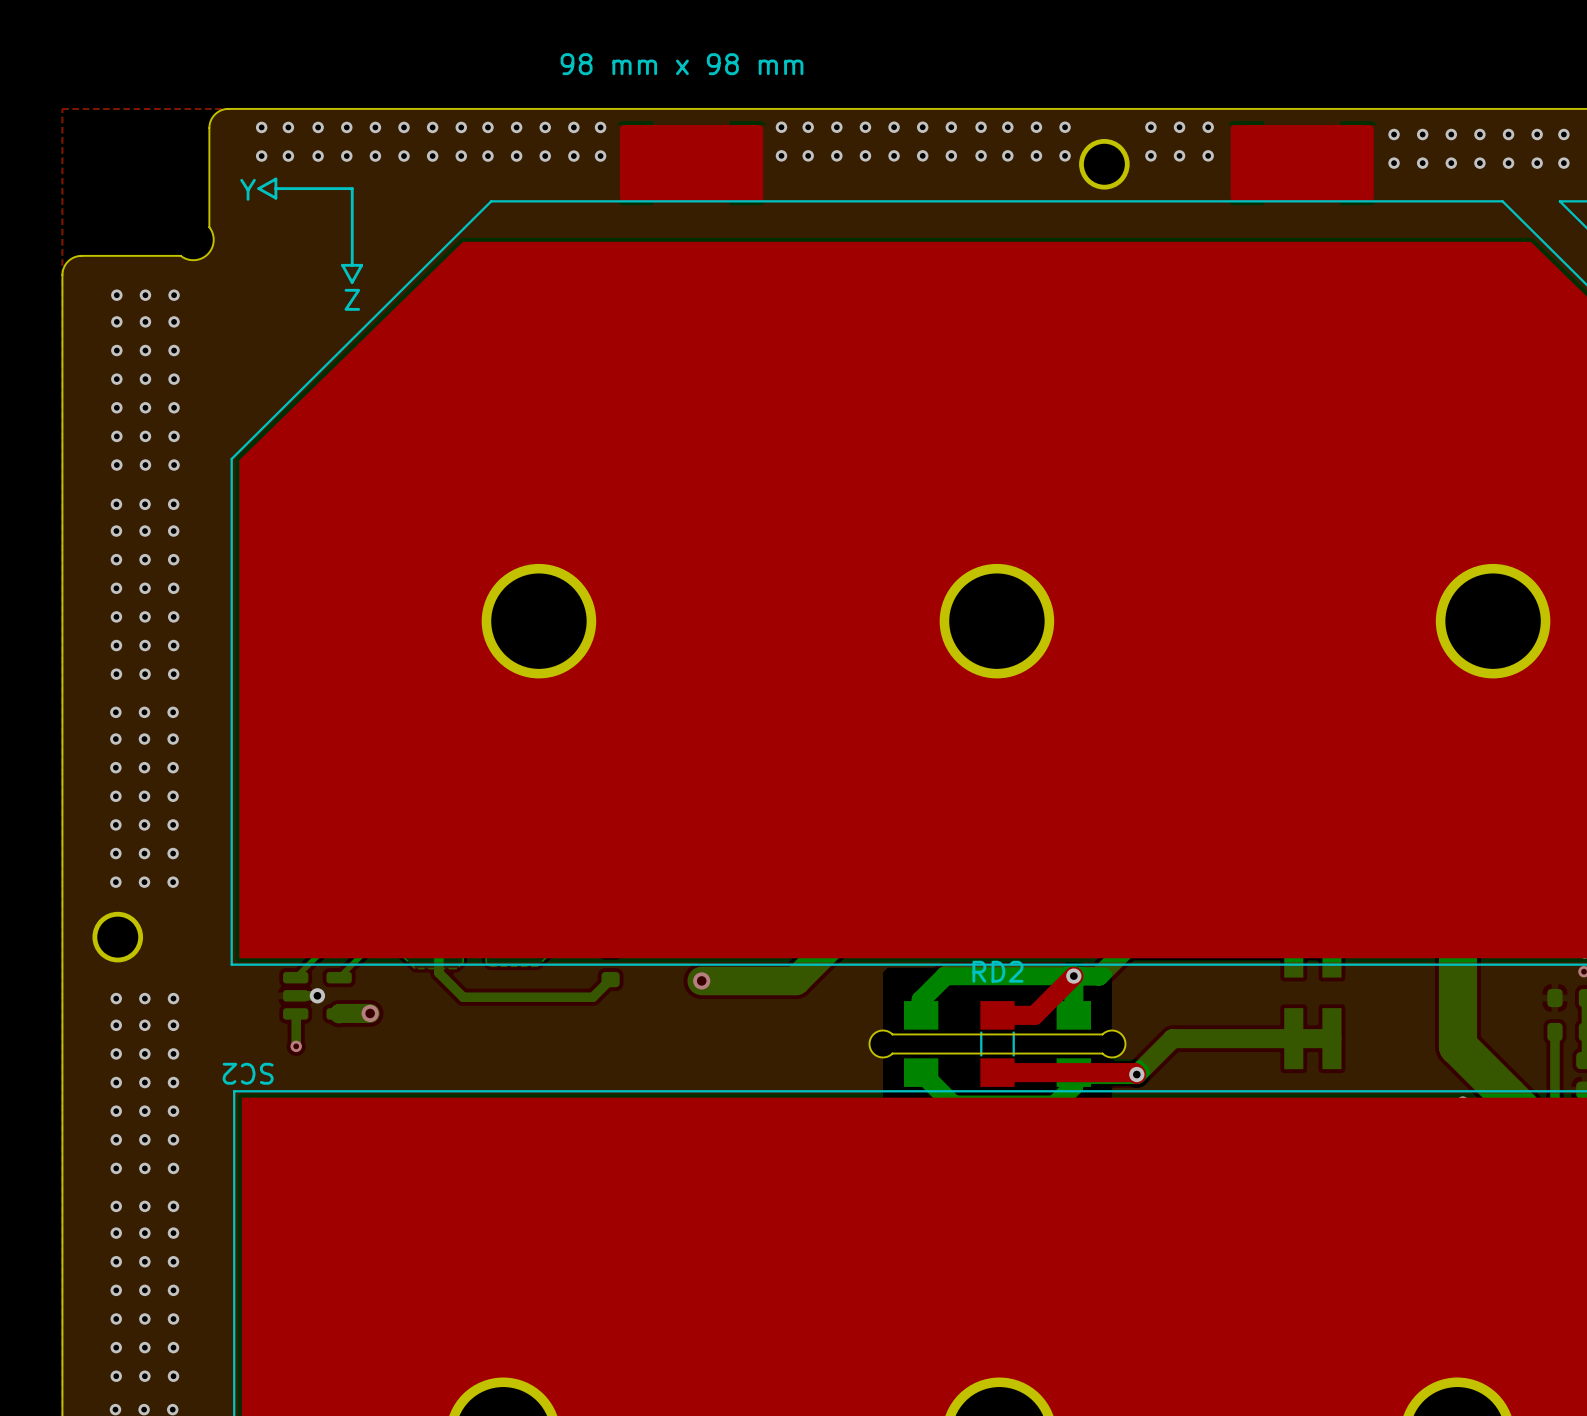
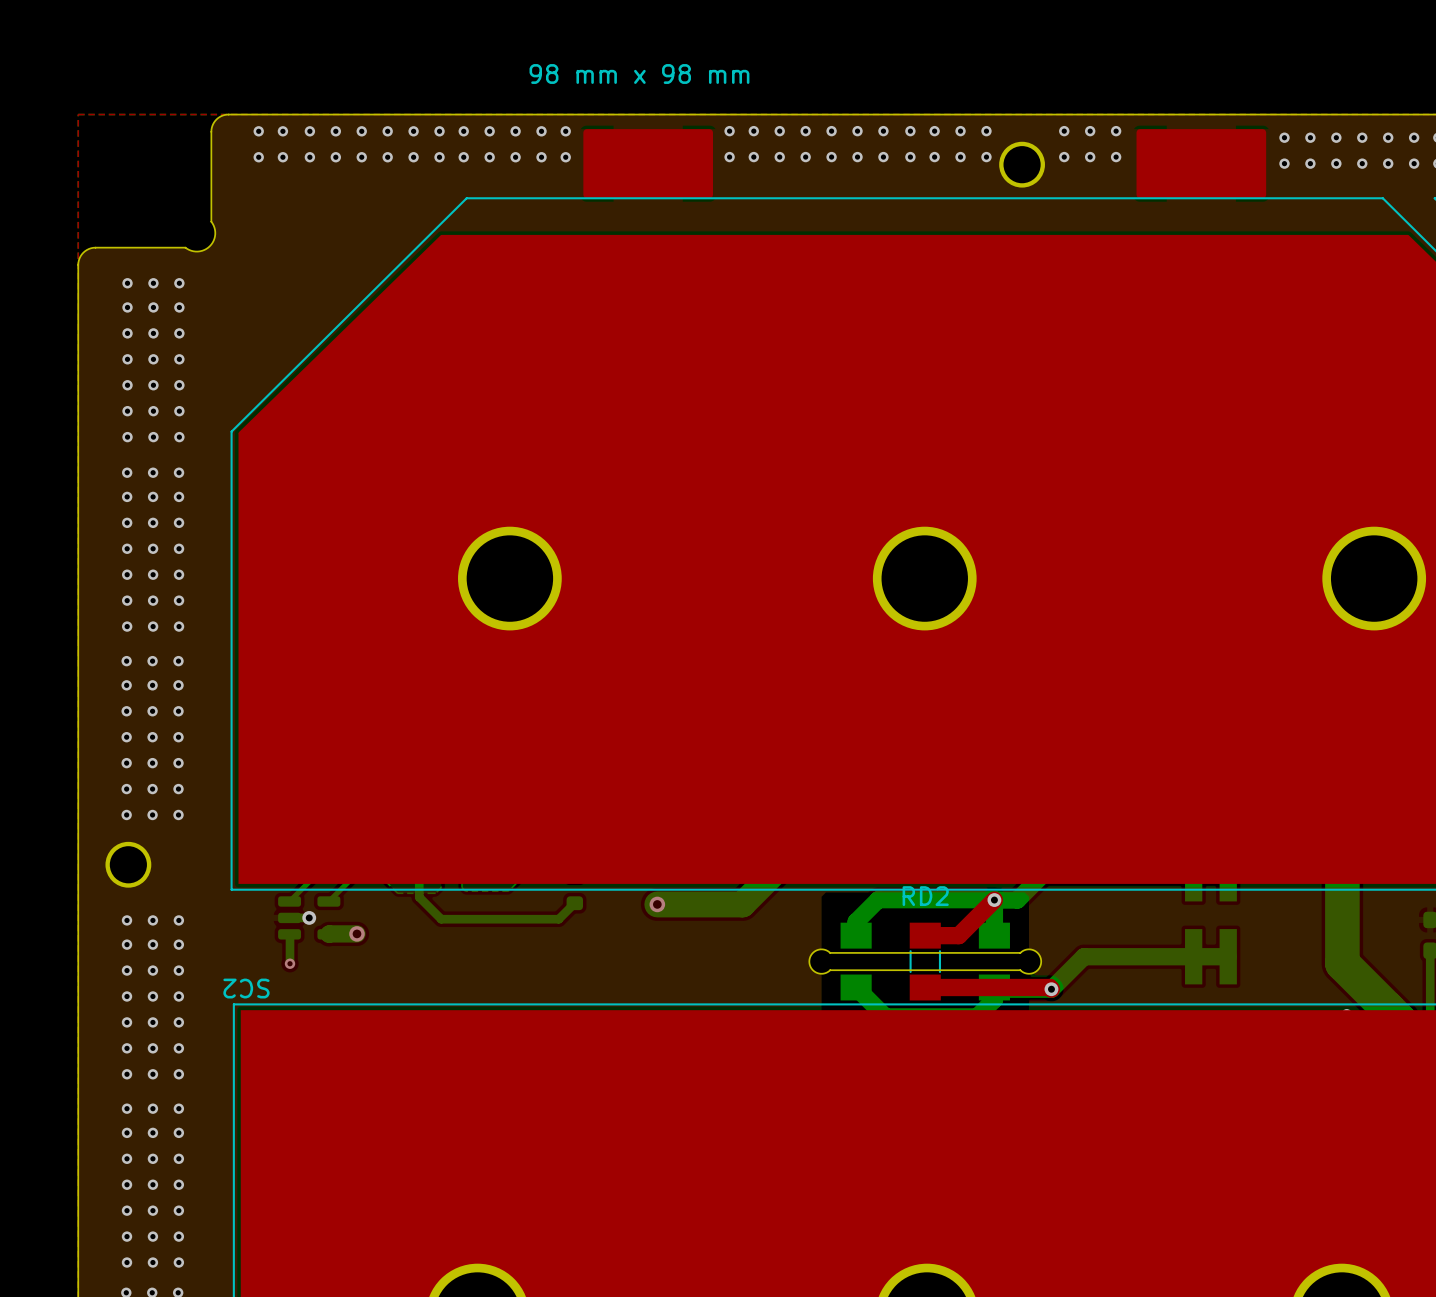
line: (275, 179) (258, 188) (275, 198) (275, 179) -> none
line: (275, 188) (352, 188) (352, 264) -> none
text: Y (248, 189) -> none
line: (342, 265) (352, 282) (361, 265) (342, 265) -> none
text: Z (352, 299) -> none

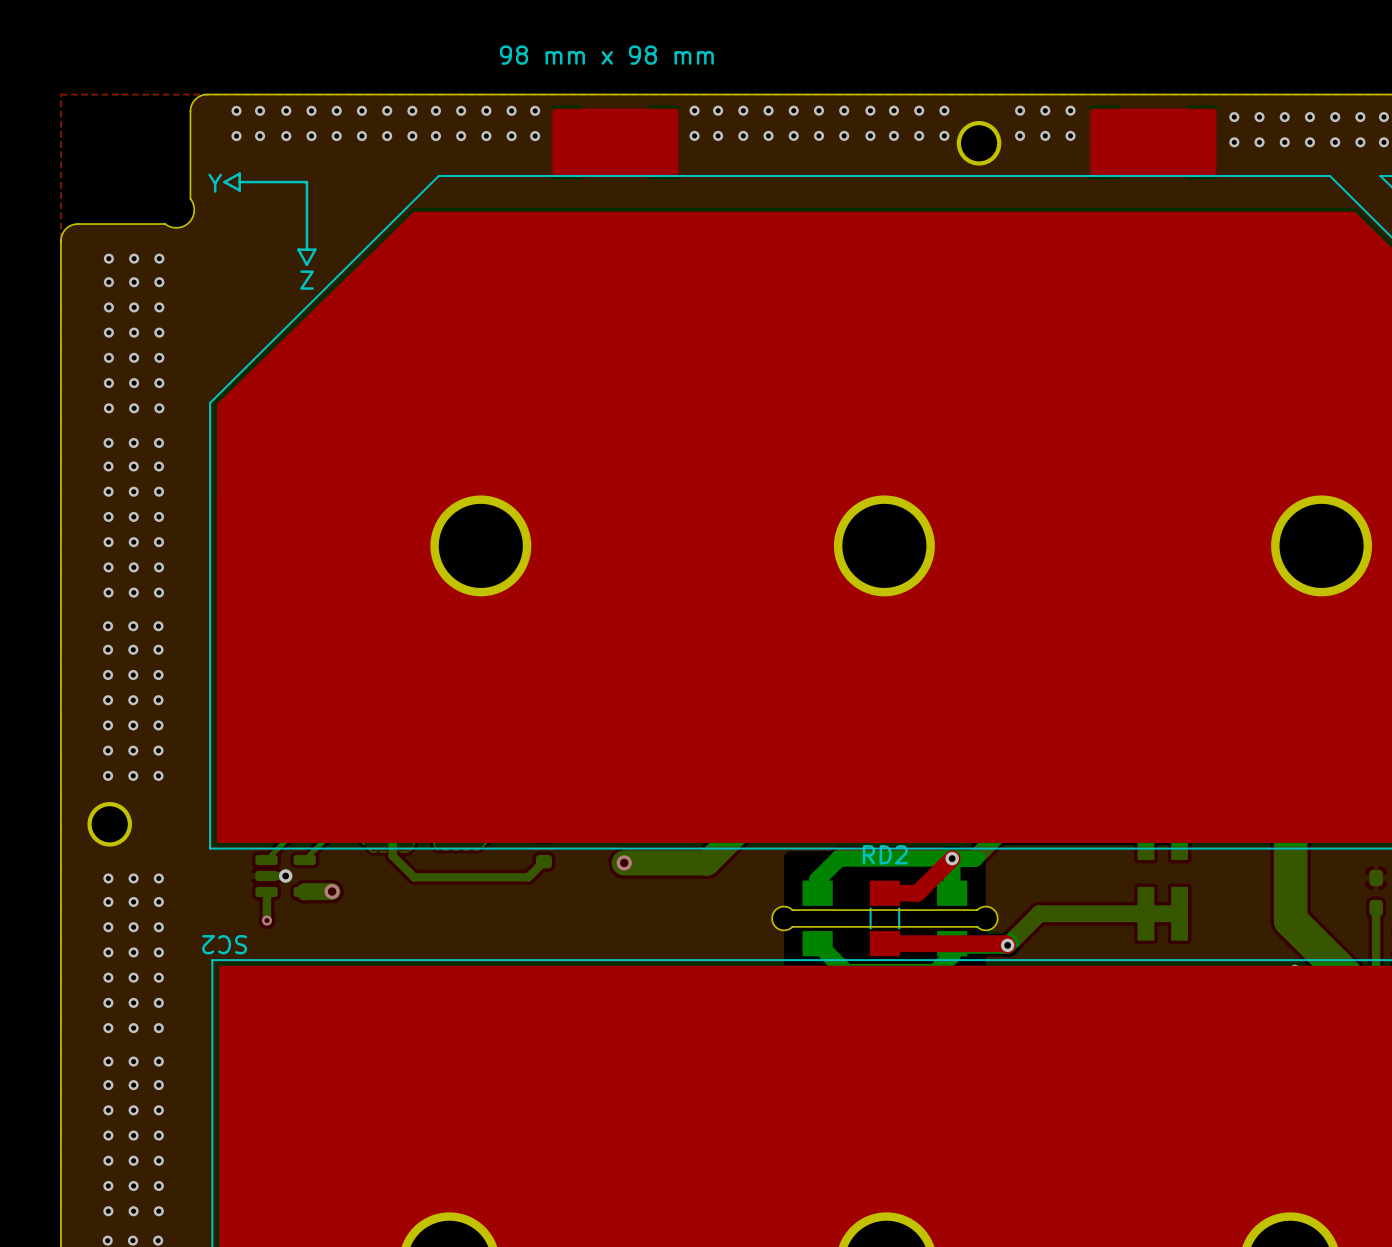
line: none -> (239, 173) (239, 190) (224, 182) (239, 173)
line: none -> (239, 182) (306, 182) (306, 249)
text: none -> Y (215, 183)
line: none -> (298, 249) (306, 264) (315, 249) (298, 249)
text: none -> Z (307, 280)

